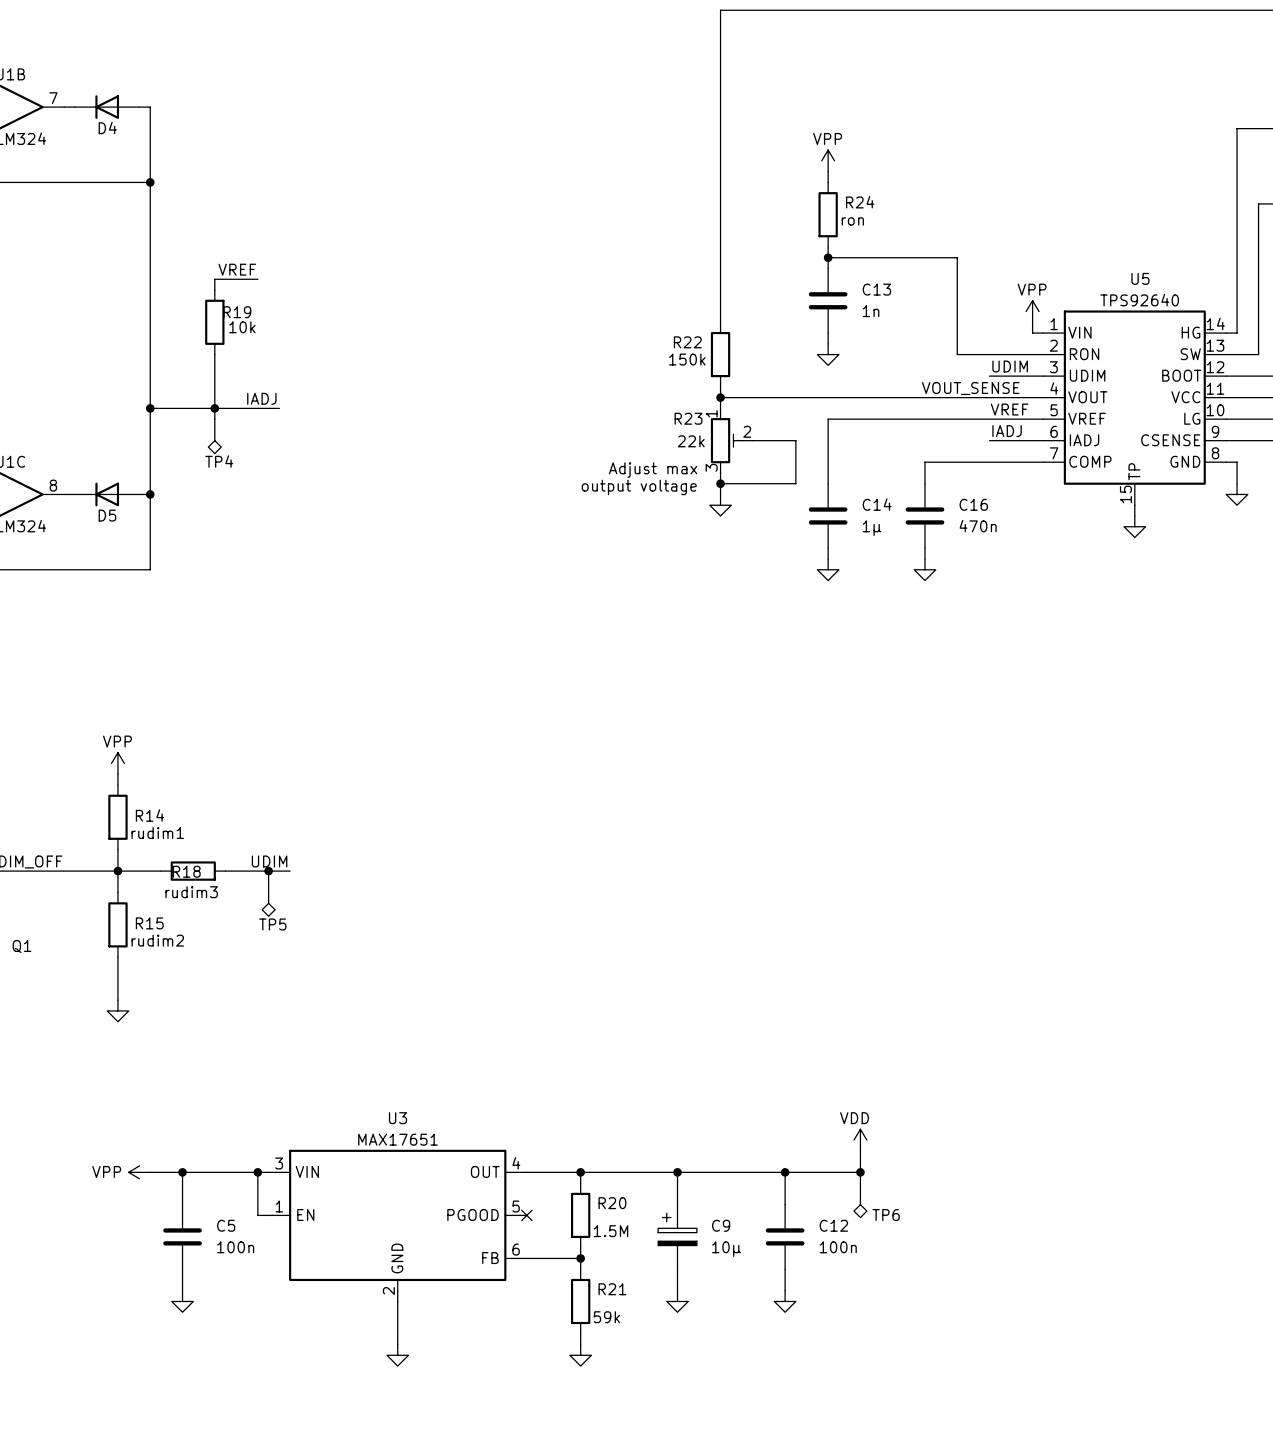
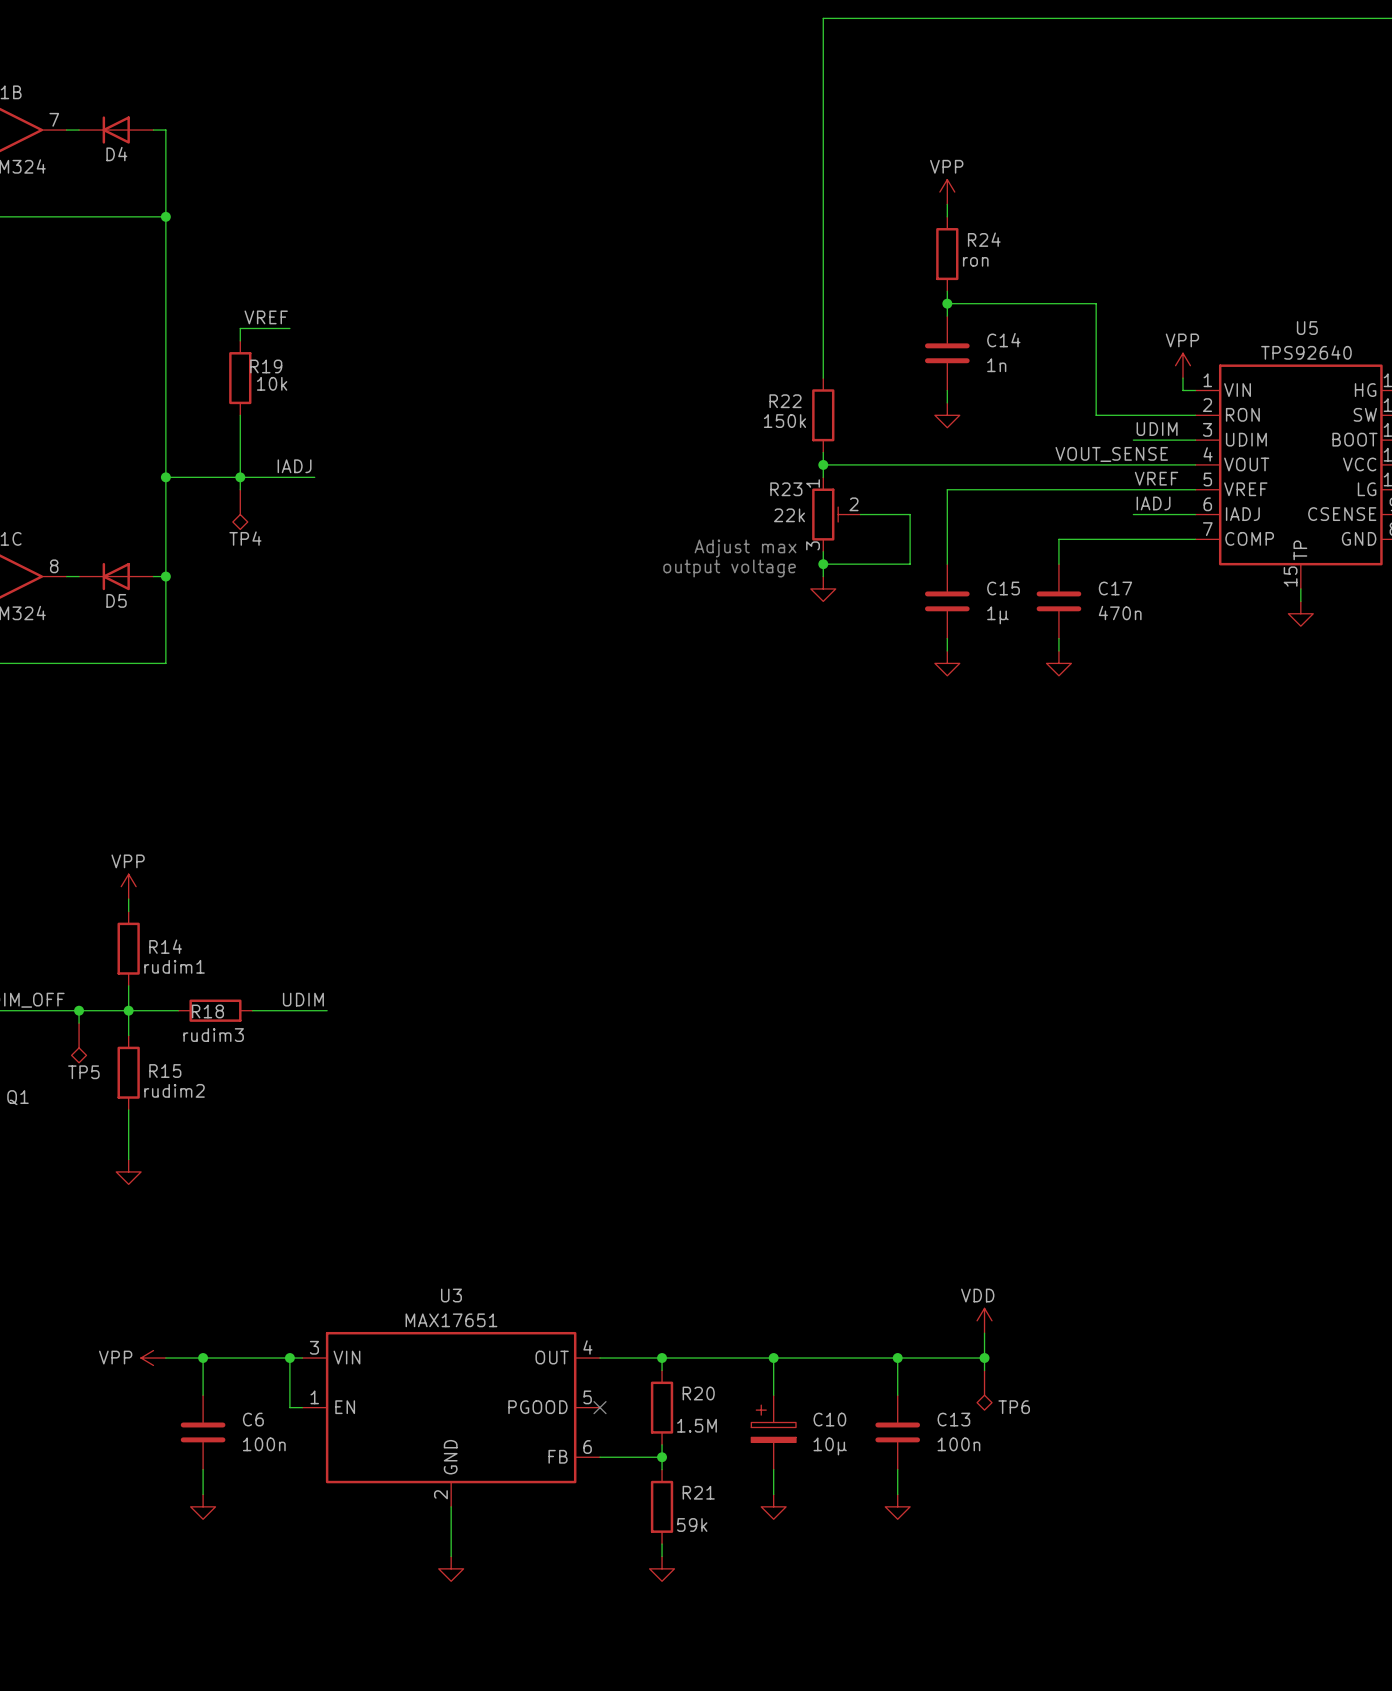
C13 name: C13 (876, 289) -> C14 (1003, 340)
C14 name: C14 (877, 504) -> C15 (1003, 588)
C16 name: C16 (973, 504) -> C17 (1115, 588)
junction: none -> (79, 1010)
wire: (268, 871) (268, 881) -> (79, 1010) (79, 1023)
junction: (268, 871) -> none
TP5 position: (268, 899) -> (79, 1042)
C5 name: C5 (226, 1225) -> C6 (253, 1419)
C9 name: C9 (721, 1225) -> C10 (829, 1419)
C12 name: C12 (833, 1225) -> C13 (953, 1419)

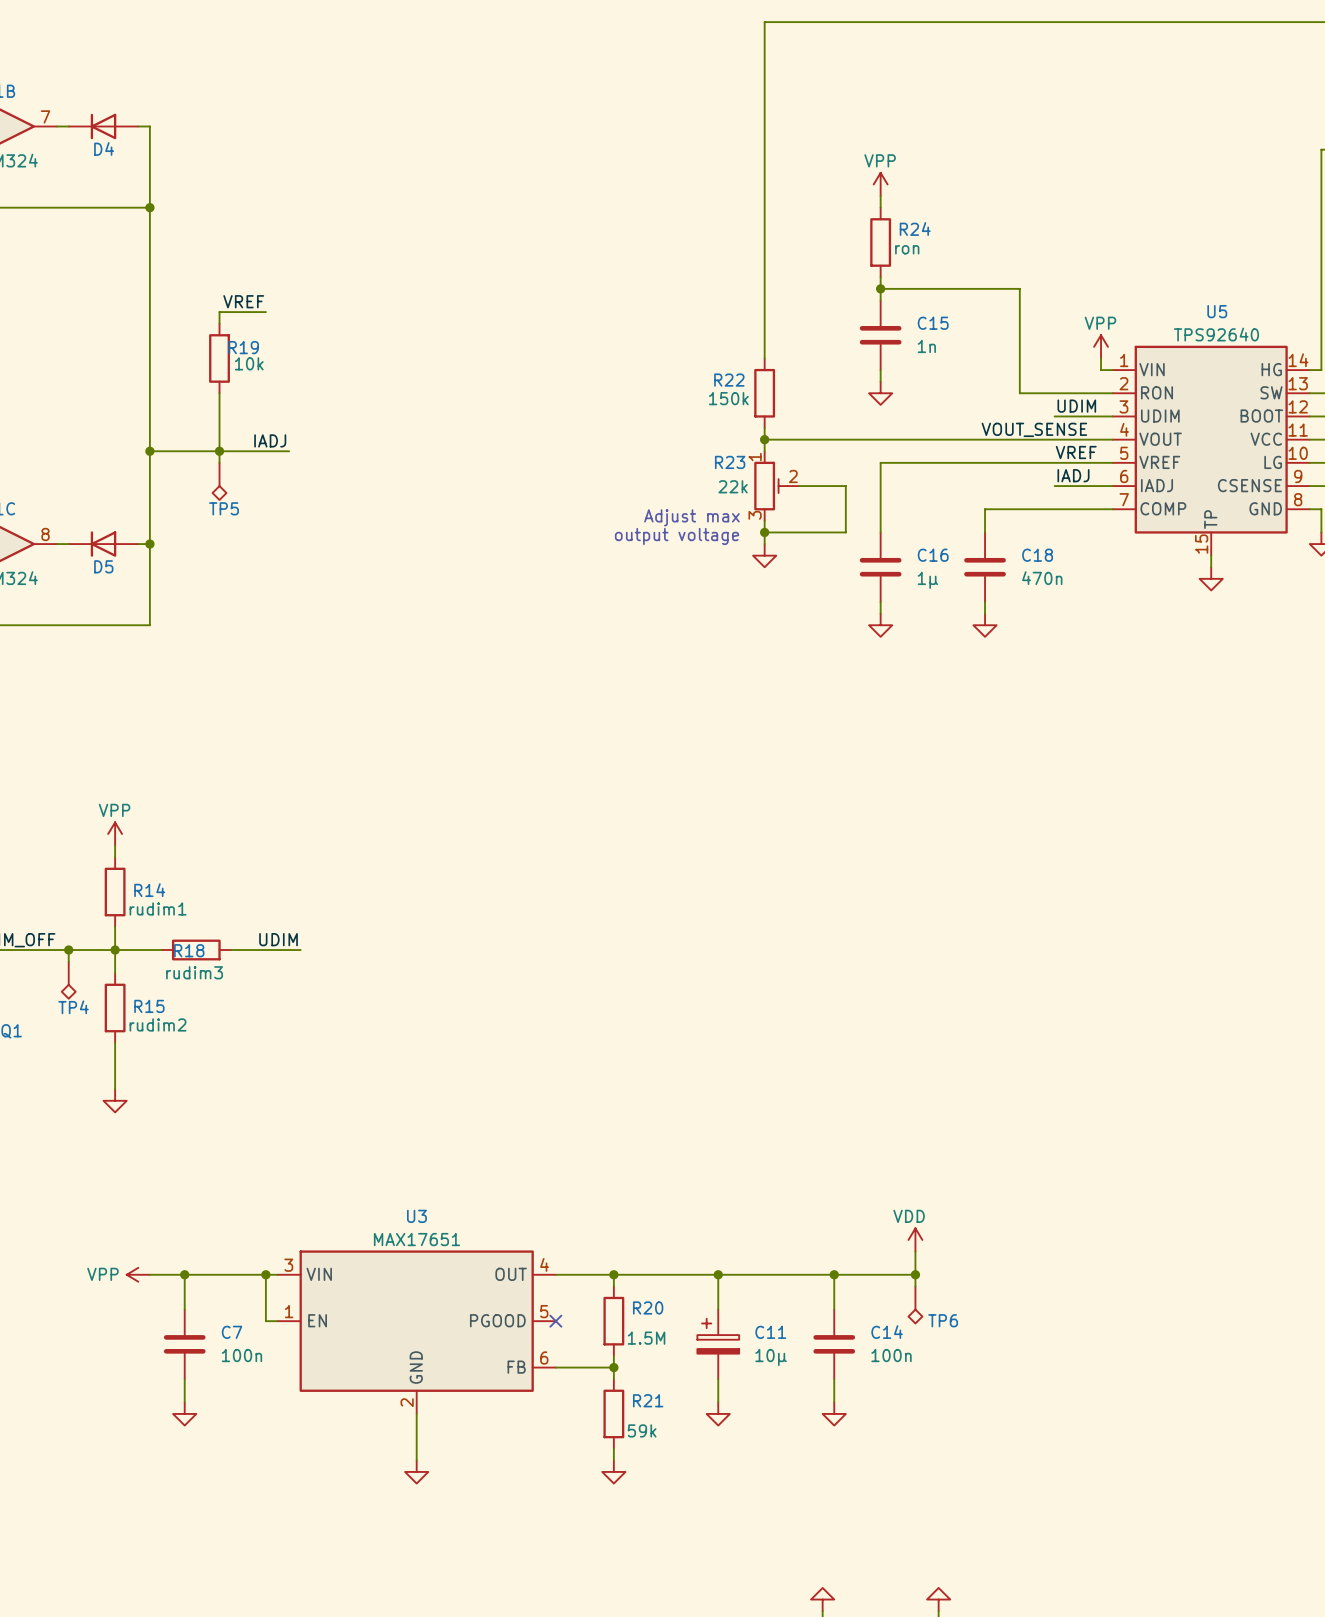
C14 name: C14 (1003, 340) -> C15 (933, 323)
TP4 name: TP4 (245, 538) -> TP5 (224, 508)
C15 name: C15 (1003, 588) -> C16 (933, 555)
C17 name: C17 (1115, 588) -> C18 (1037, 555)
TP5 name: TP5 (83, 1072) -> TP4 (73, 1007)
C6 name: C6 (253, 1419) -> C7 (232, 1332)
C10 name: C10 (829, 1419) -> C11 (770, 1332)
C13 name: C13 (953, 1419) -> C14 (887, 1332)

